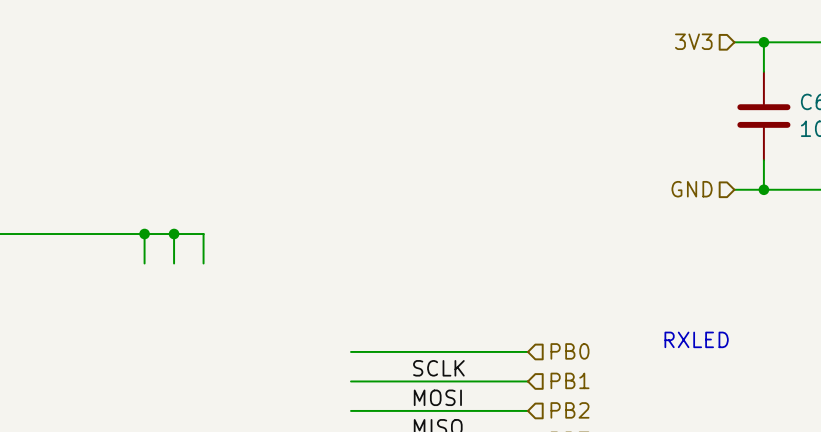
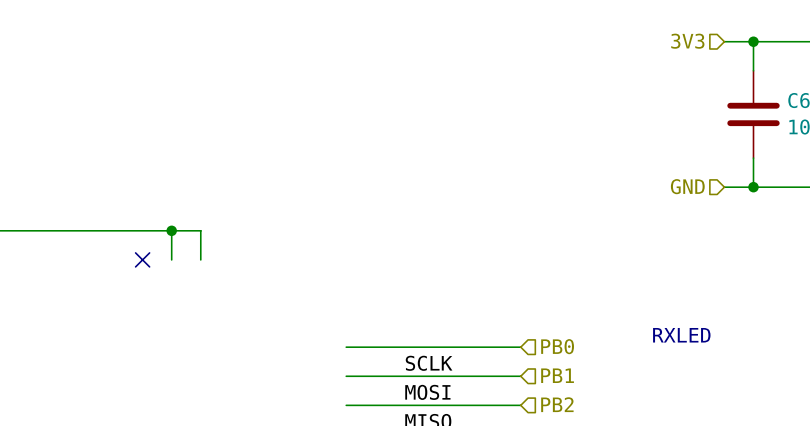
wire: (144, 234) (144, 263) -> none
junction: (144, 234) -> none
no-connect mark: none -> (142, 259)

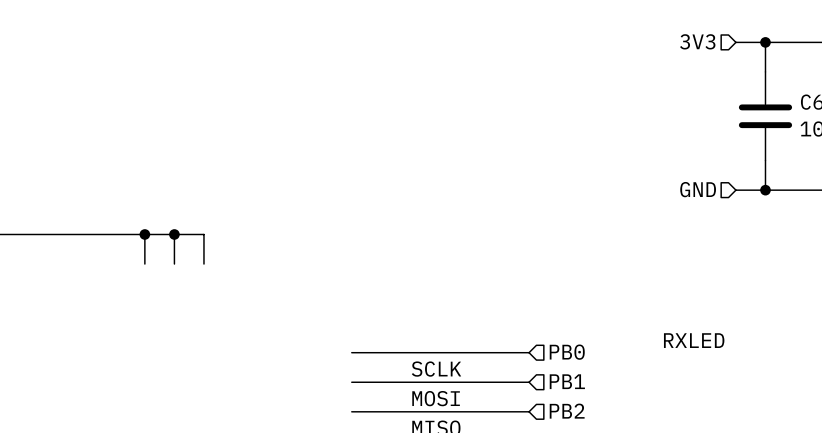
wire: none -> (144, 234) (144, 264)
junction: none -> (144, 234)
no-connect mark: (142, 259) -> none

